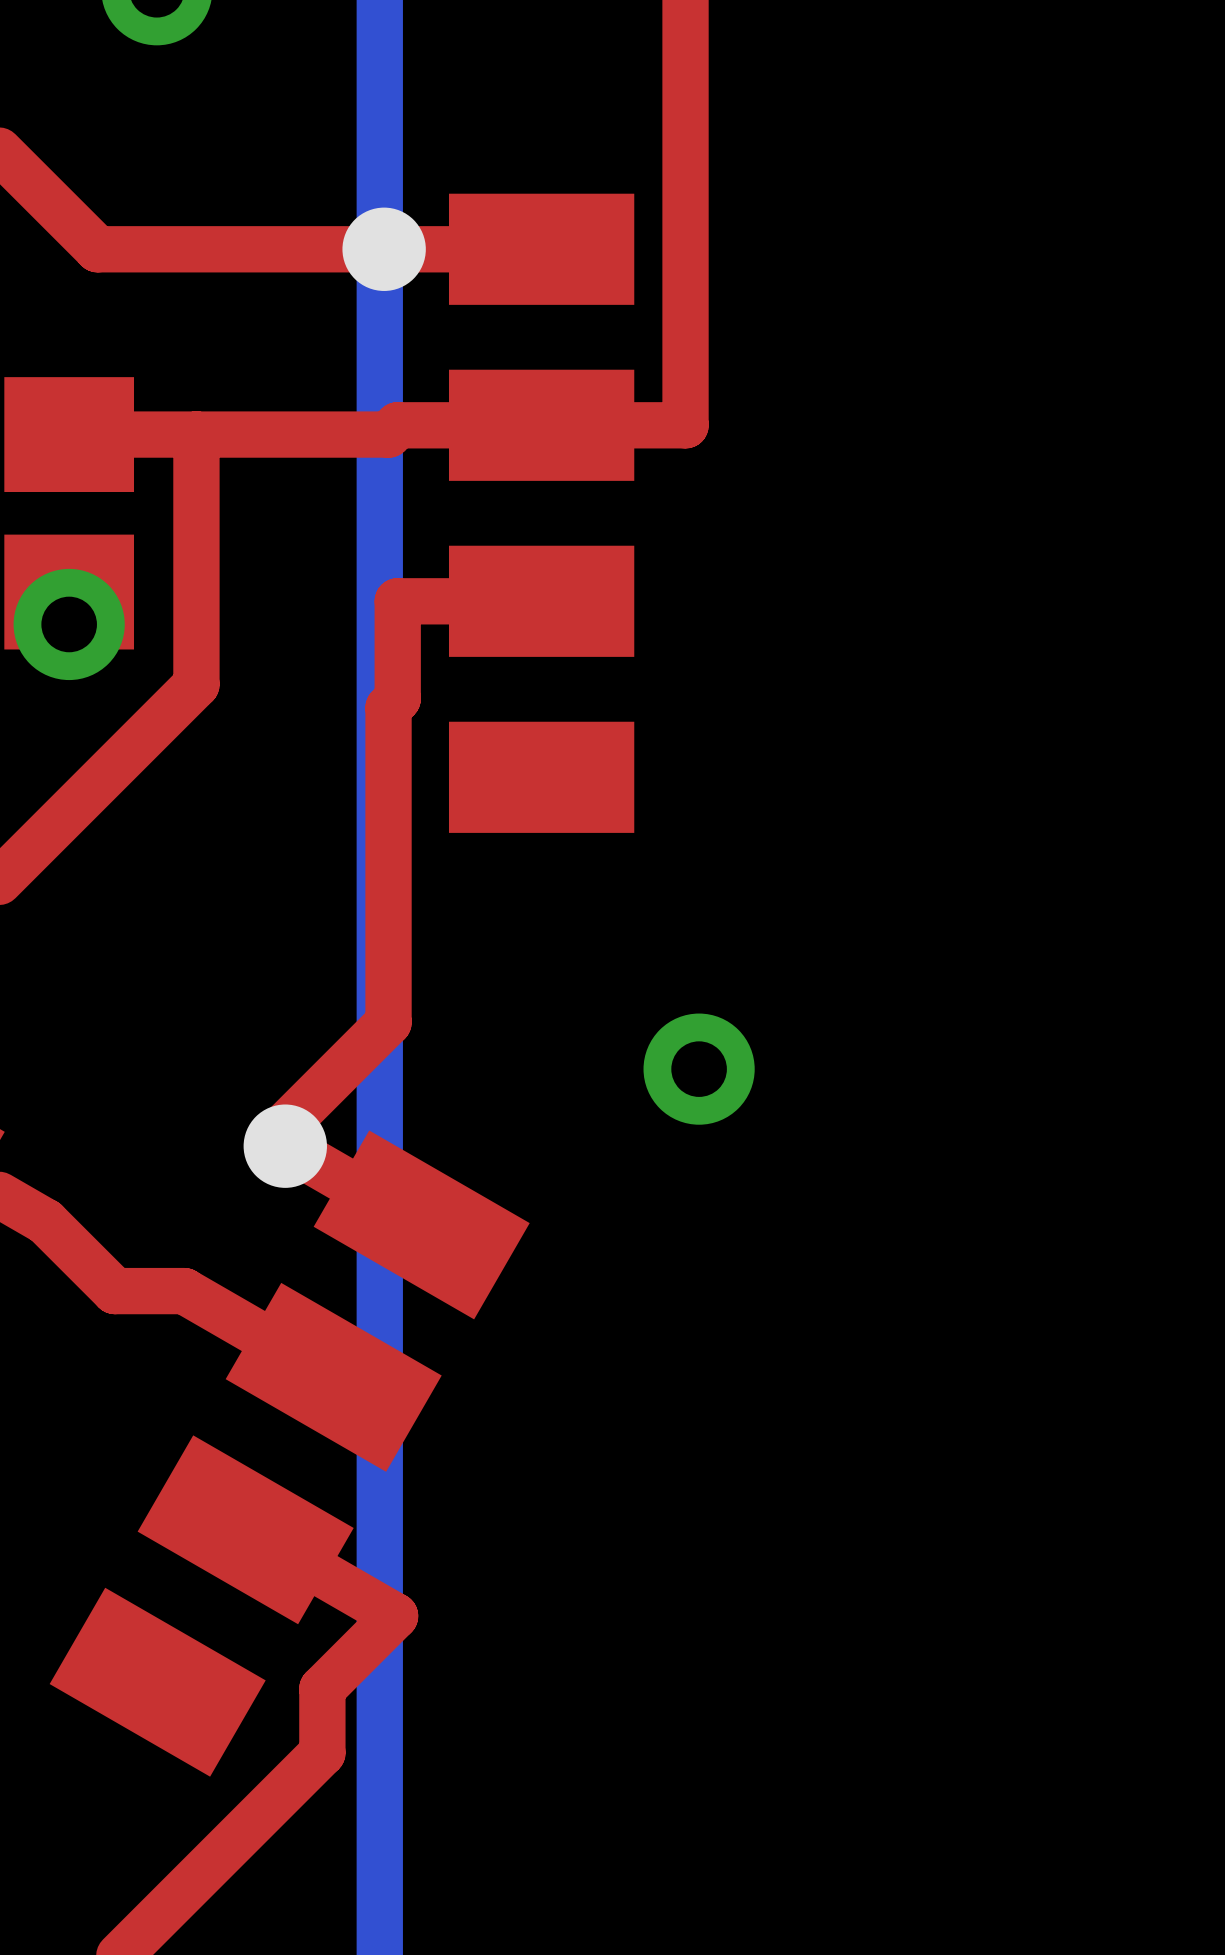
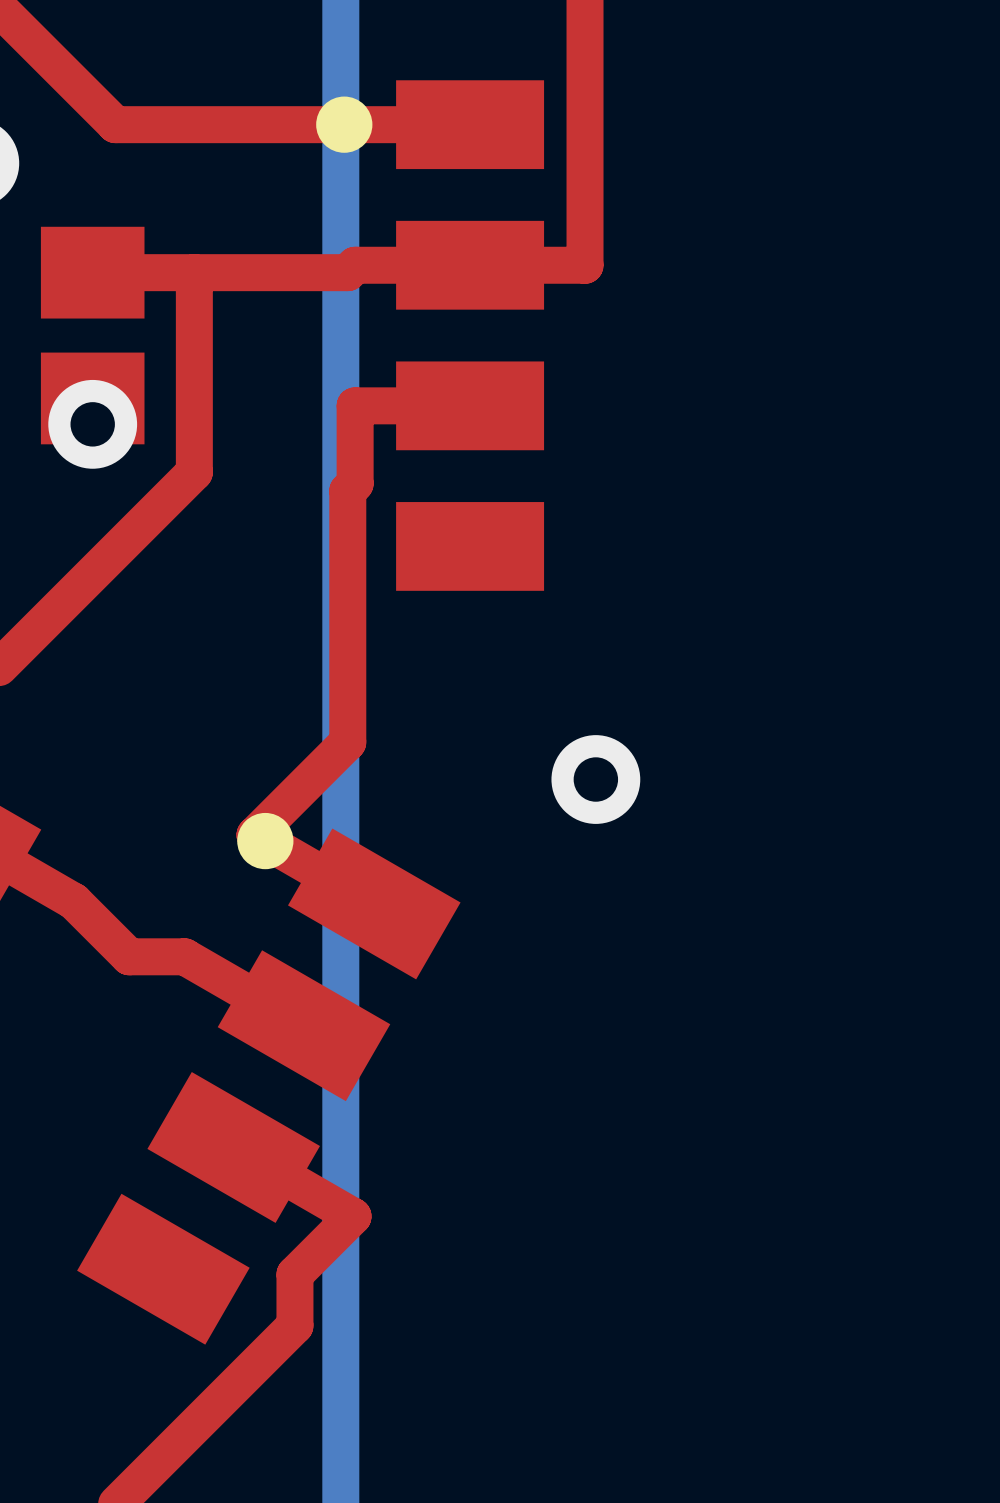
part footprint: [342, 193, 635, 833] -> [316, 80, 545, 591]
part footprint: [49, 1104, 530, 1777] -> [77, 812, 461, 1345]

